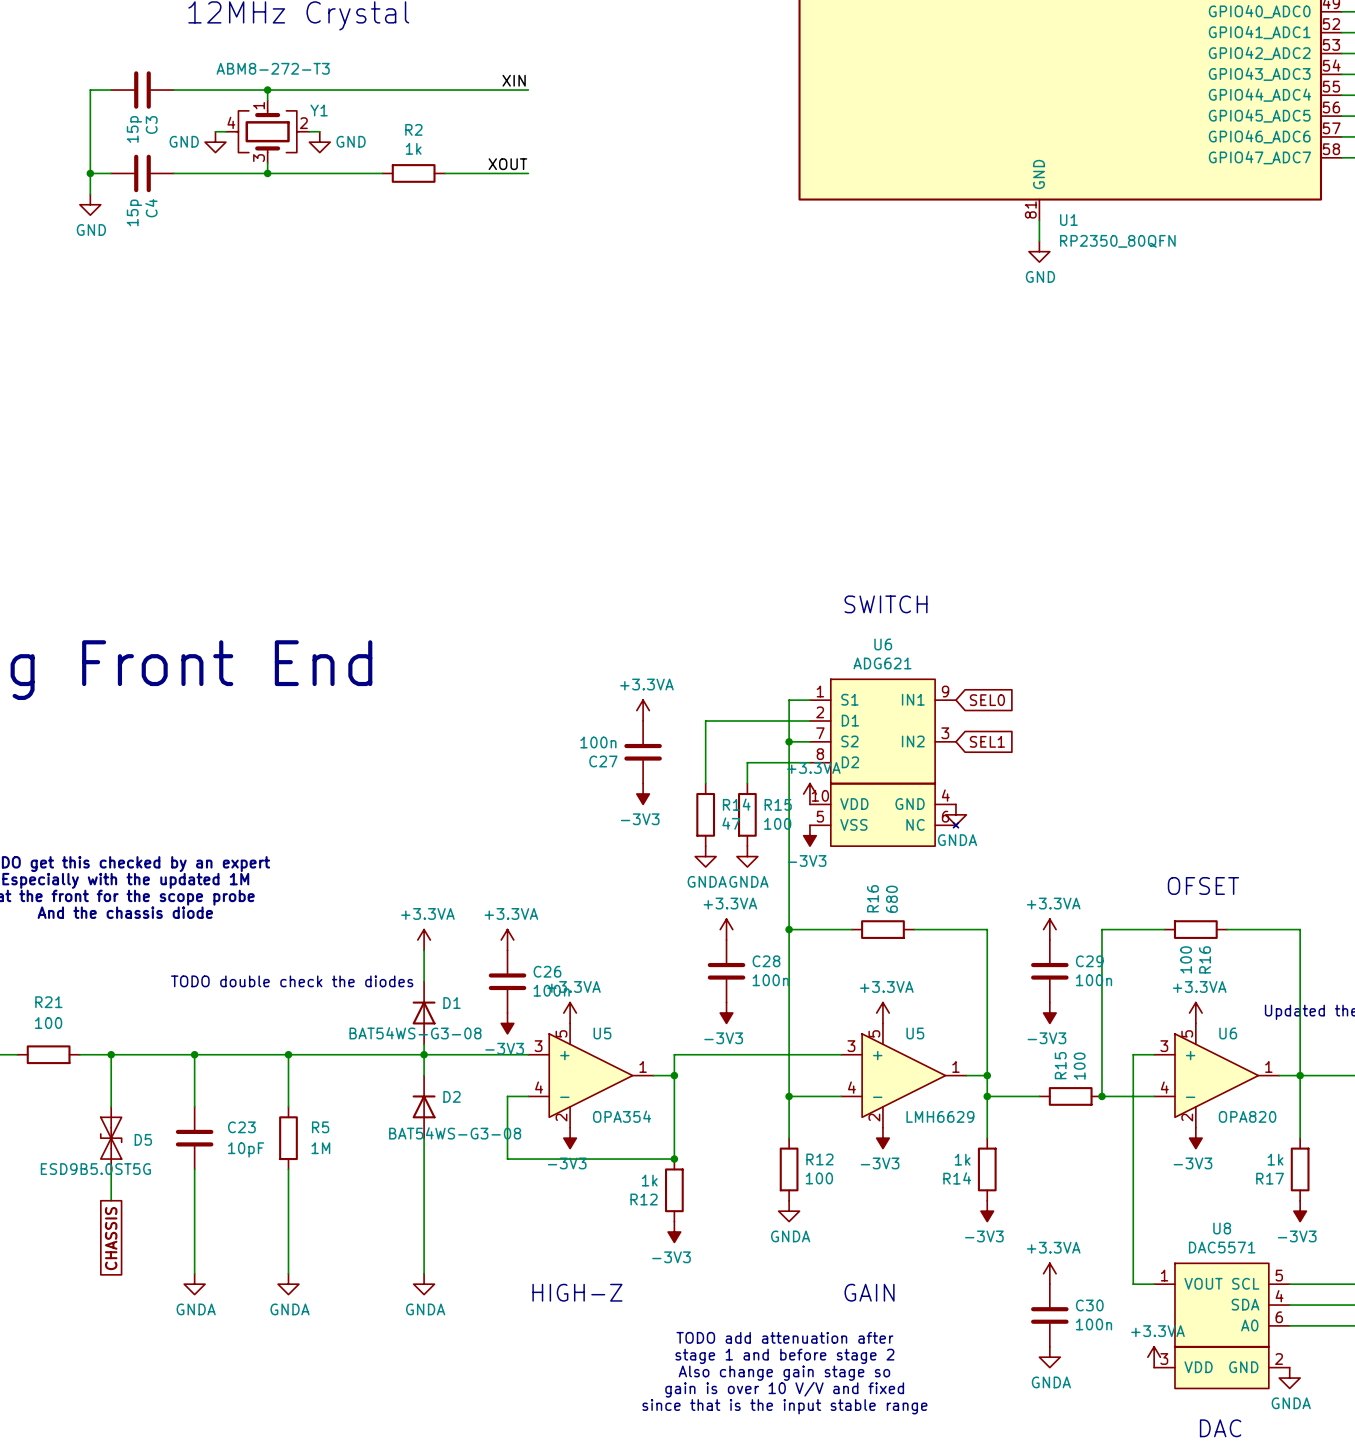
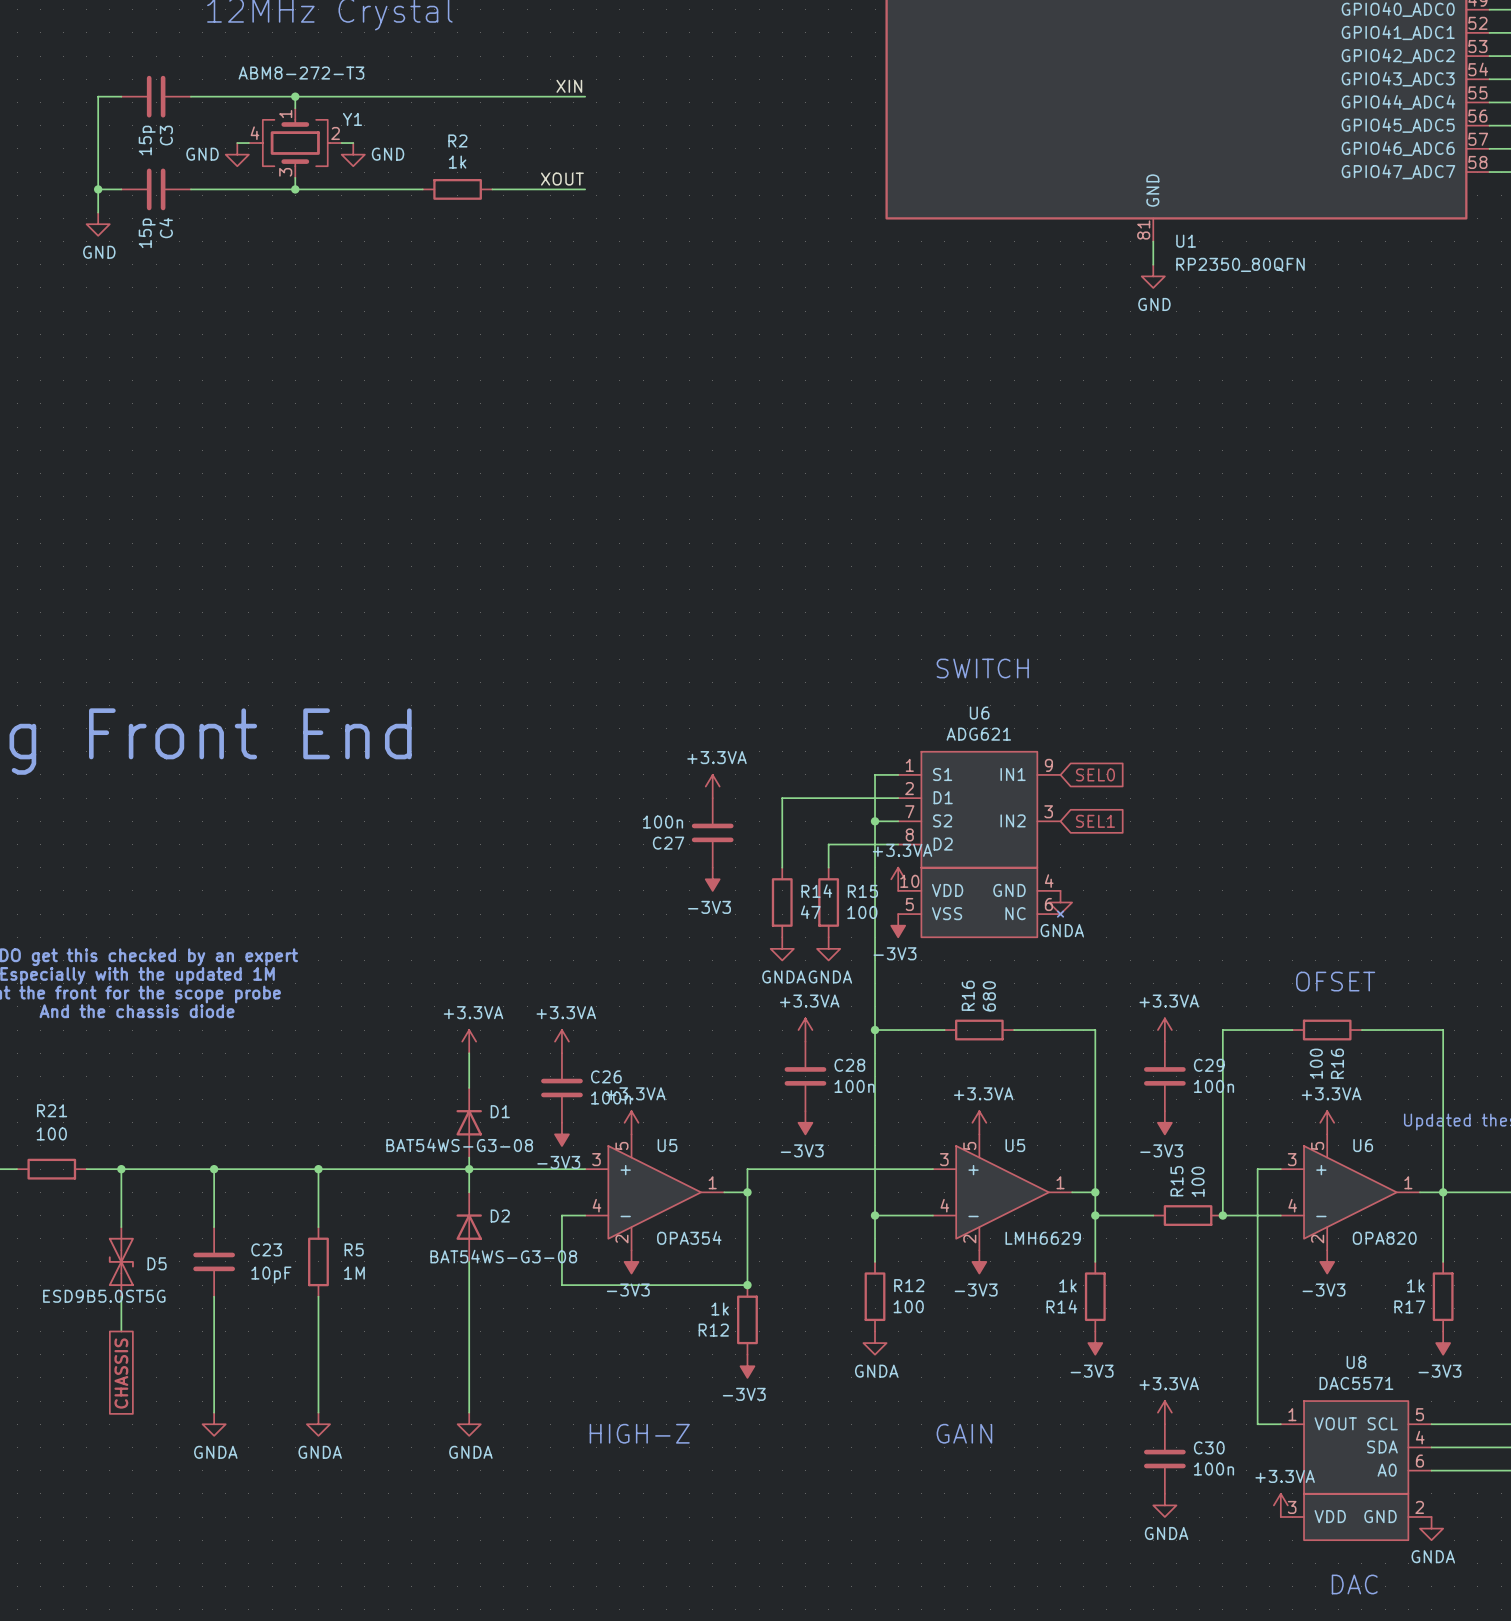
text: TODO double check the diodes (292, 981) -> none
text: TODO add attenuation after (784, 1337) -> none
text: stage 1 and before stage 2 (784, 1356) -> none
text: Also change gain stage so (784, 1373) -> none
text: gain is over 10 V/V and fixed (784, 1389) -> none
text: since that is the input stable range (784, 1406) -> none

